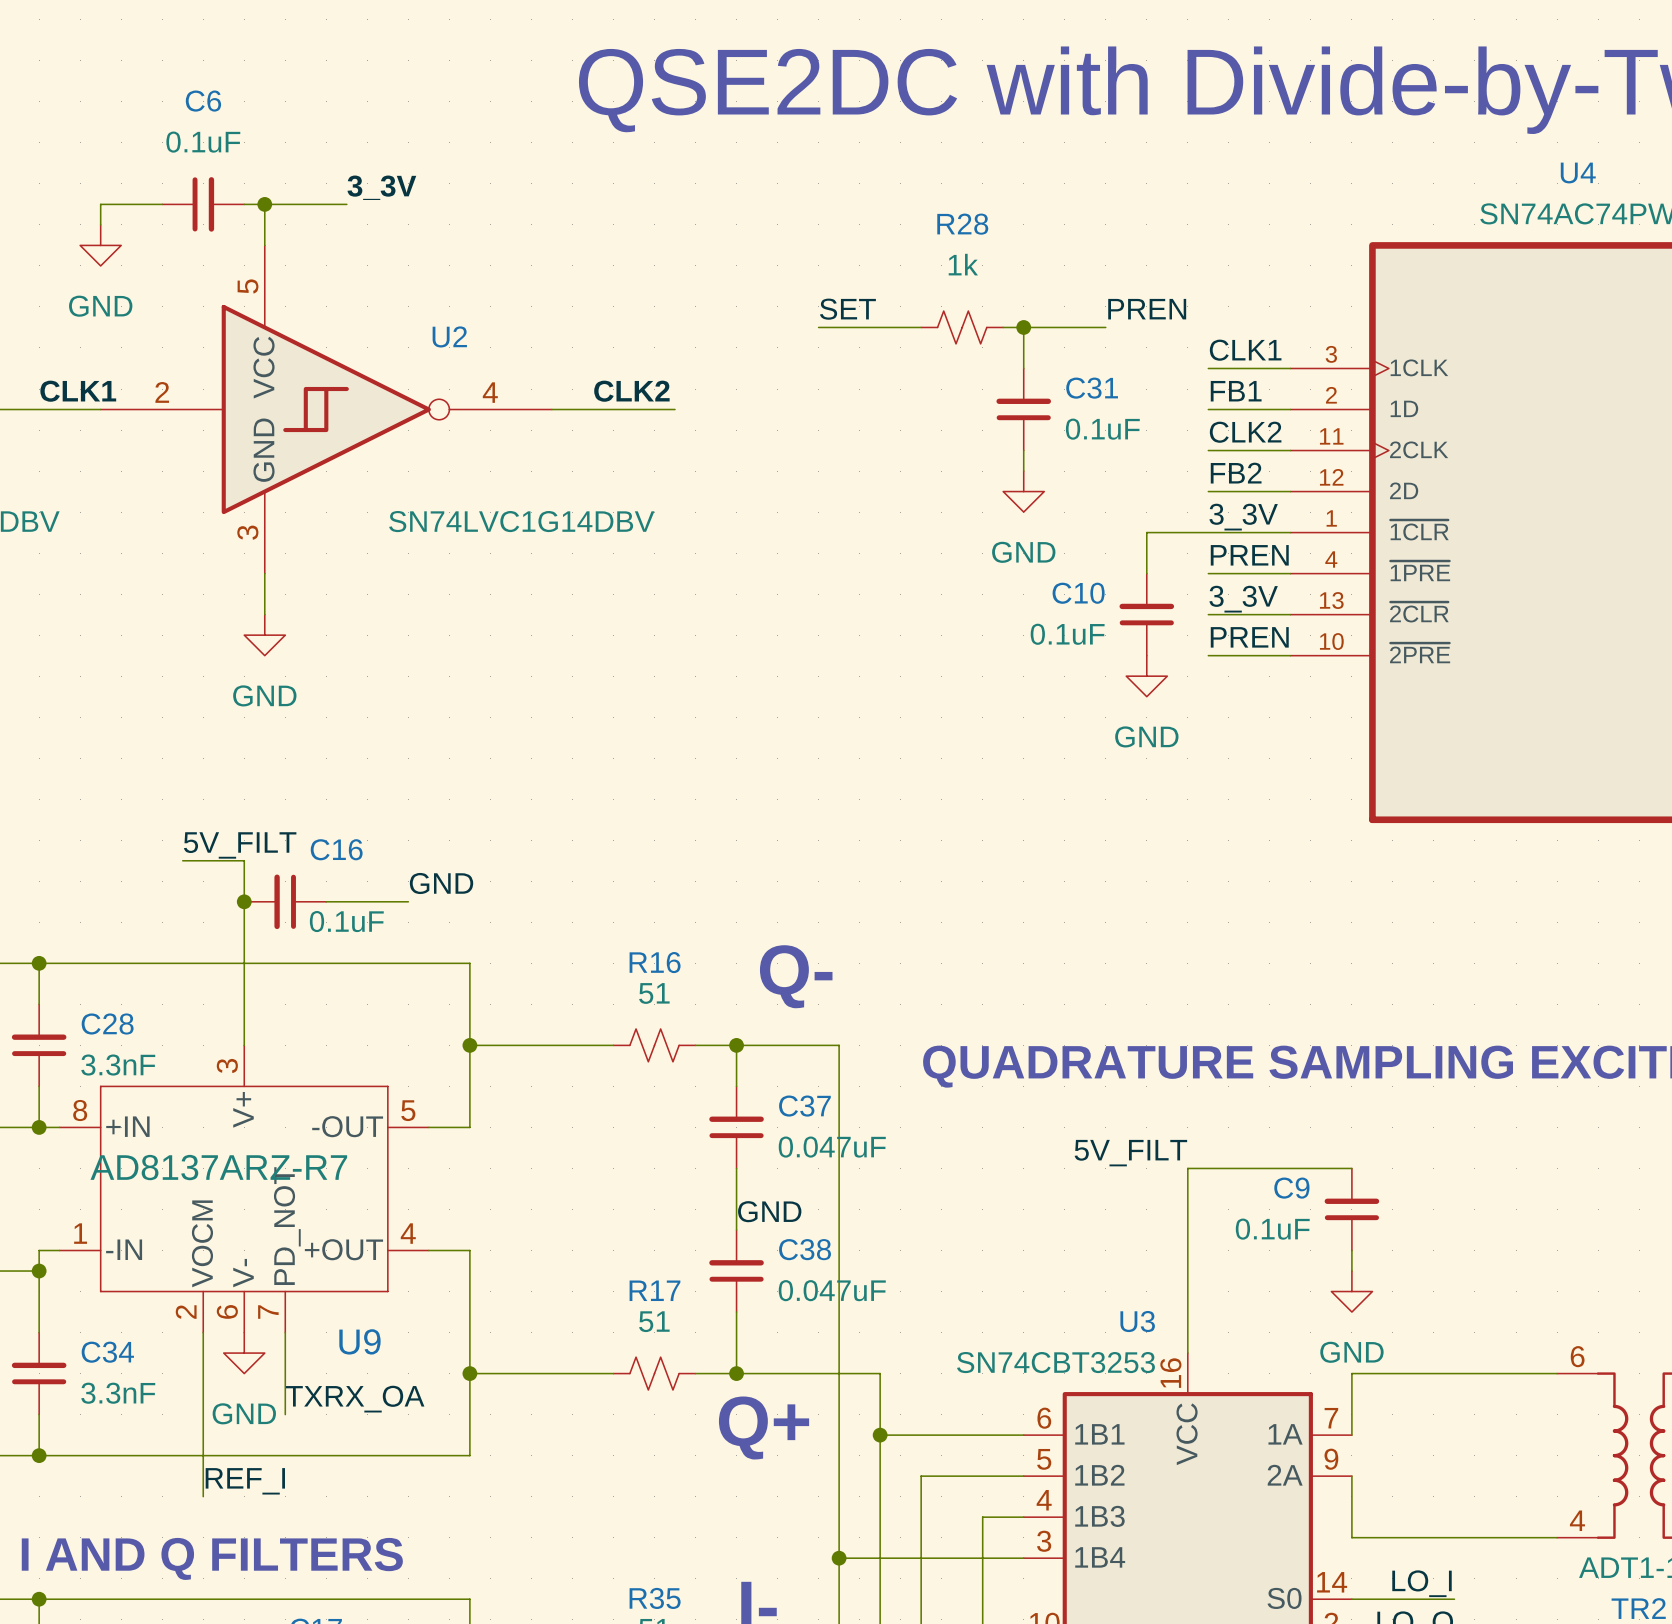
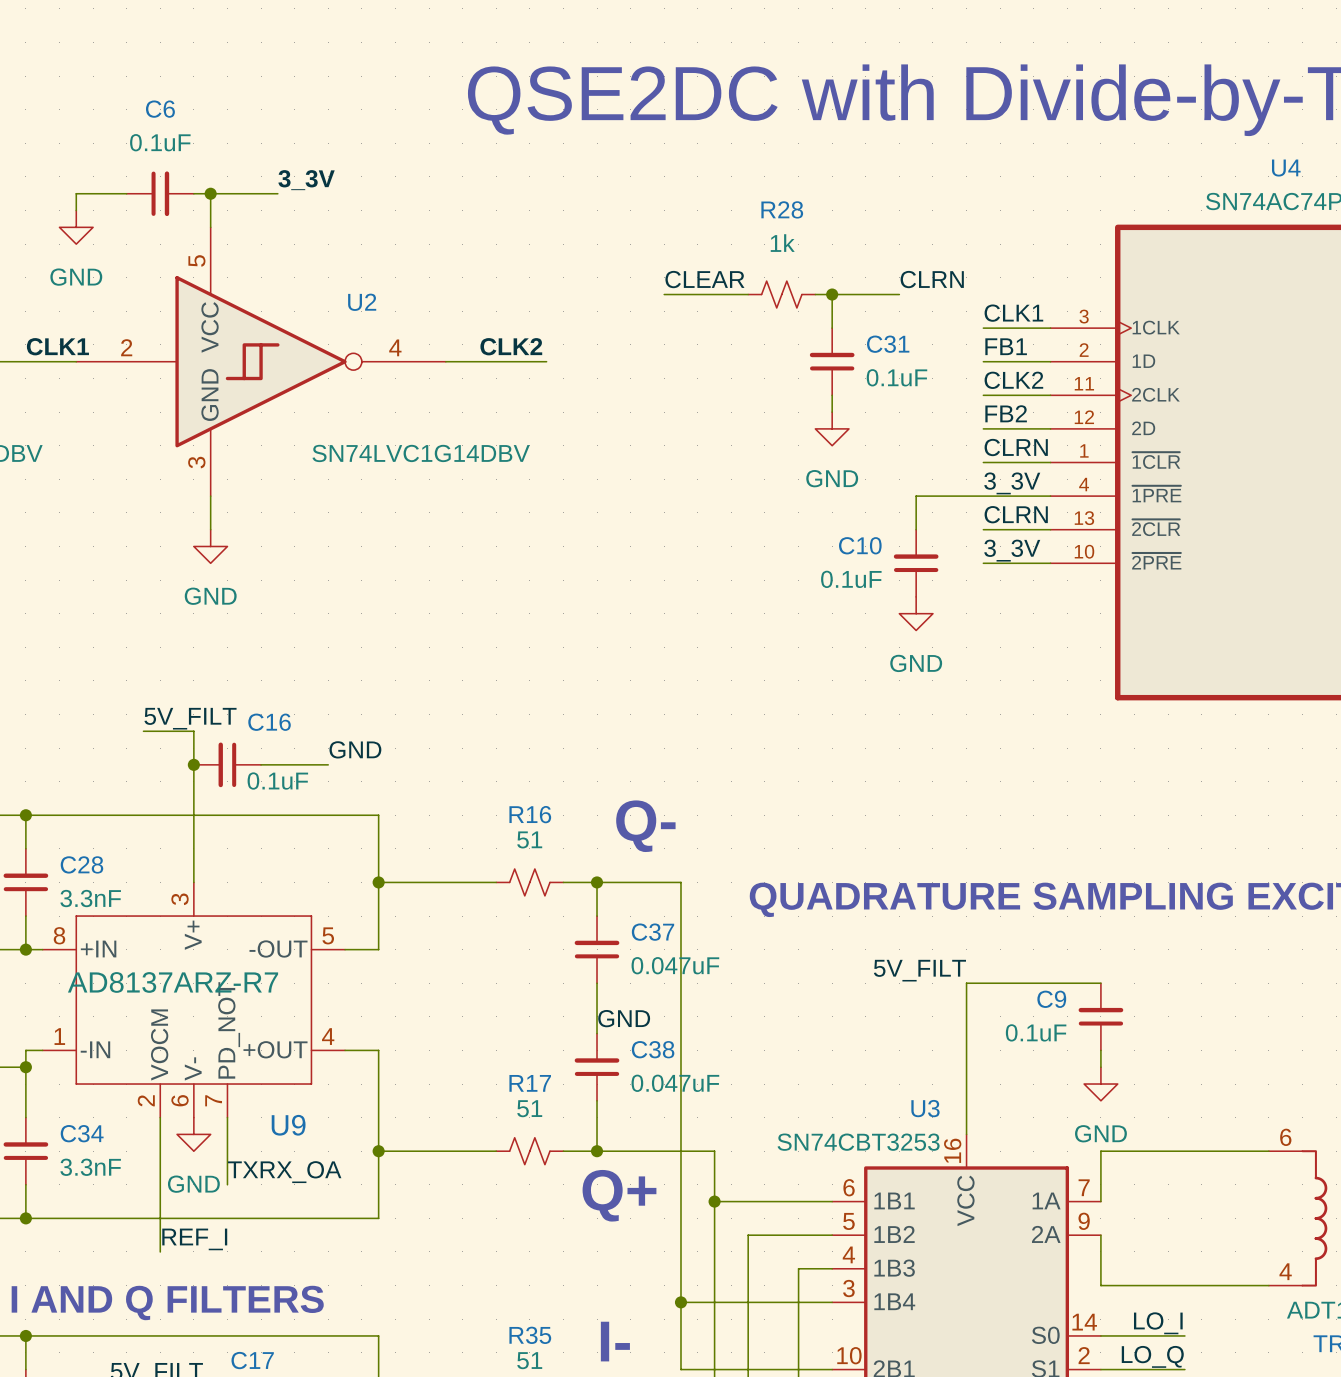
label: SET (847, 309) -> CLEAR (704, 279)
label: PREN (1147, 309) -> CLRN (932, 279)
label: 3_3V (1243, 517) -> CLRN (1016, 447)
wire: (1208, 532) (1146, 532) (1146, 573) -> none
label: PREN (1249, 555) -> 3_3V (1012, 483)
wire: none -> (983, 496) (916, 496) (916, 529)
label: 3_3V (1243, 599) -> CLRN (1016, 514)
C10 position: (1146, 614) -> (916, 563)
label: PREN (1249, 637) -> 3_3V (1012, 550)
power symbol position: GND (1146, 676) -> GND (916, 613)

